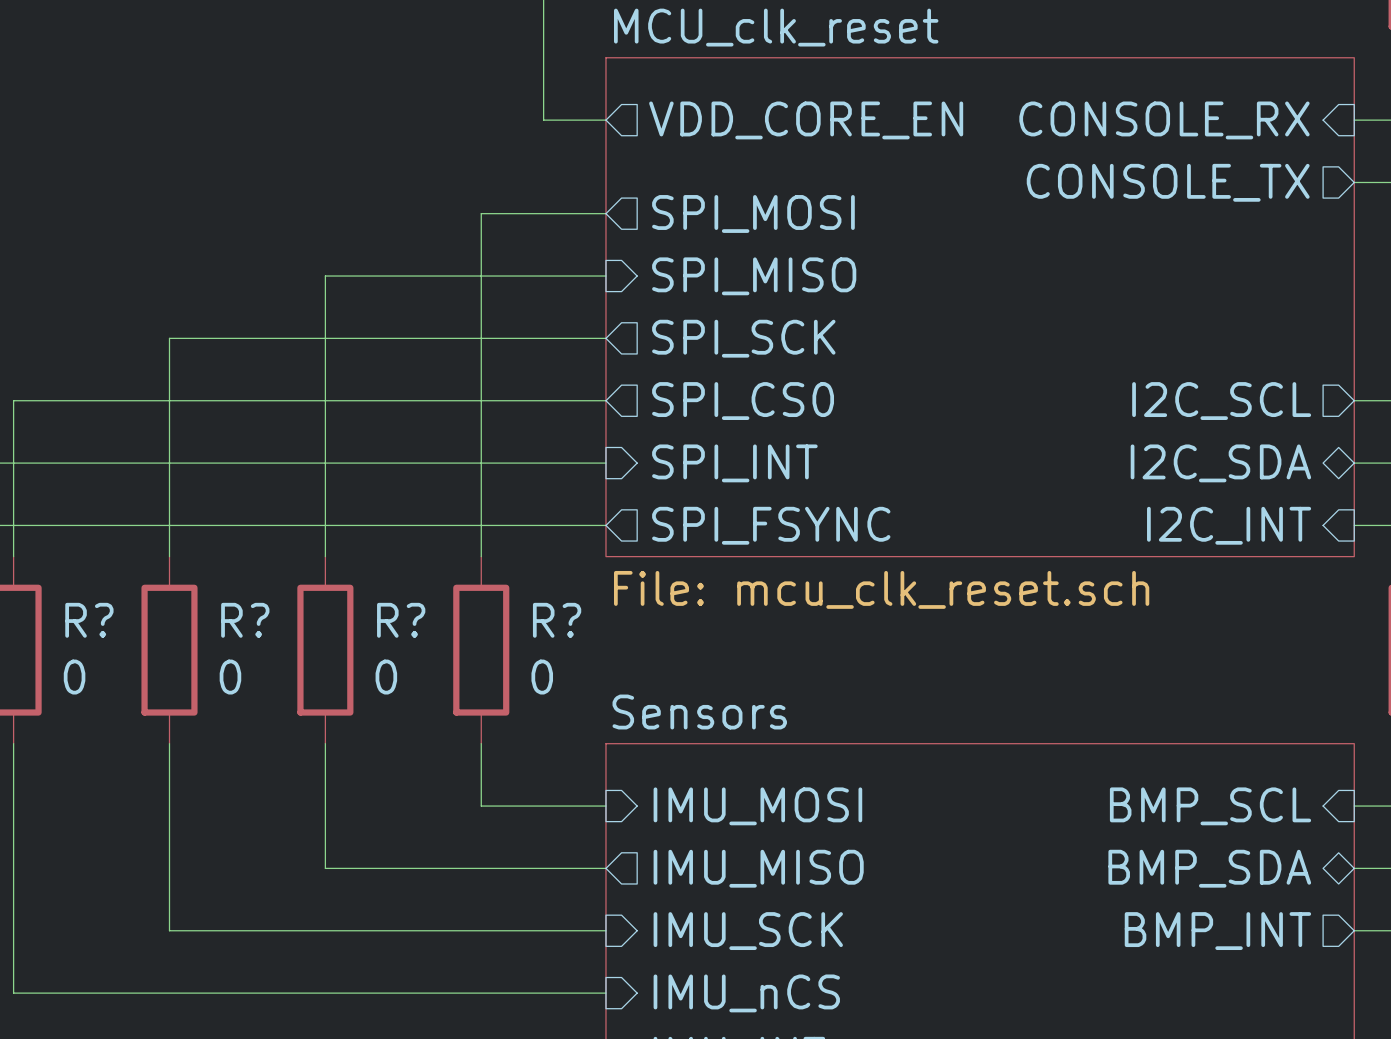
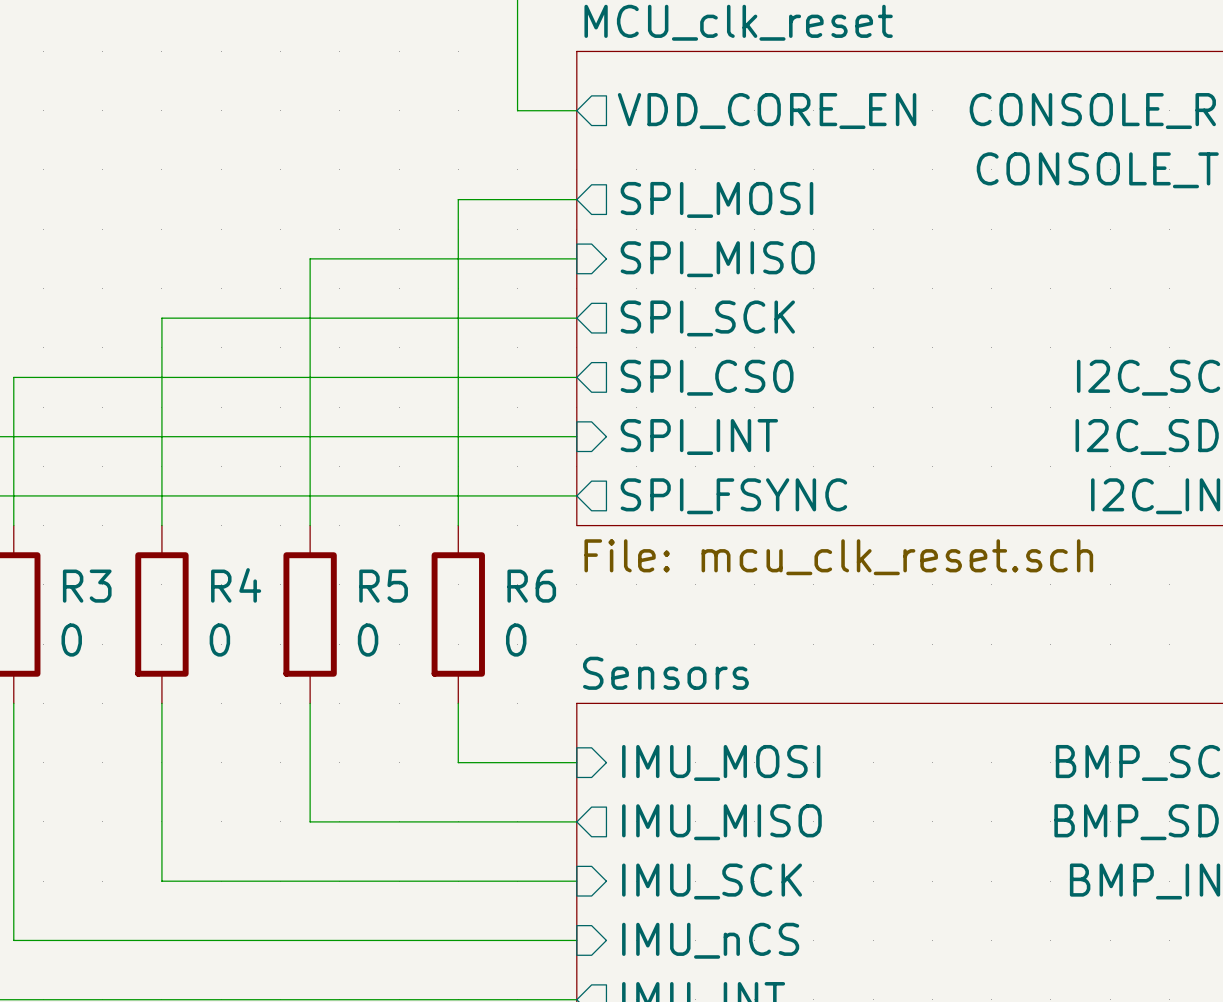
R? name: R? (89, 620) -> R3 (87, 586)
R? name: R? (245, 620) -> R4 (236, 585)
R? name: R? (401, 620) -> R5 (383, 586)
R? name: R? (557, 620) -> R6 (531, 586)

